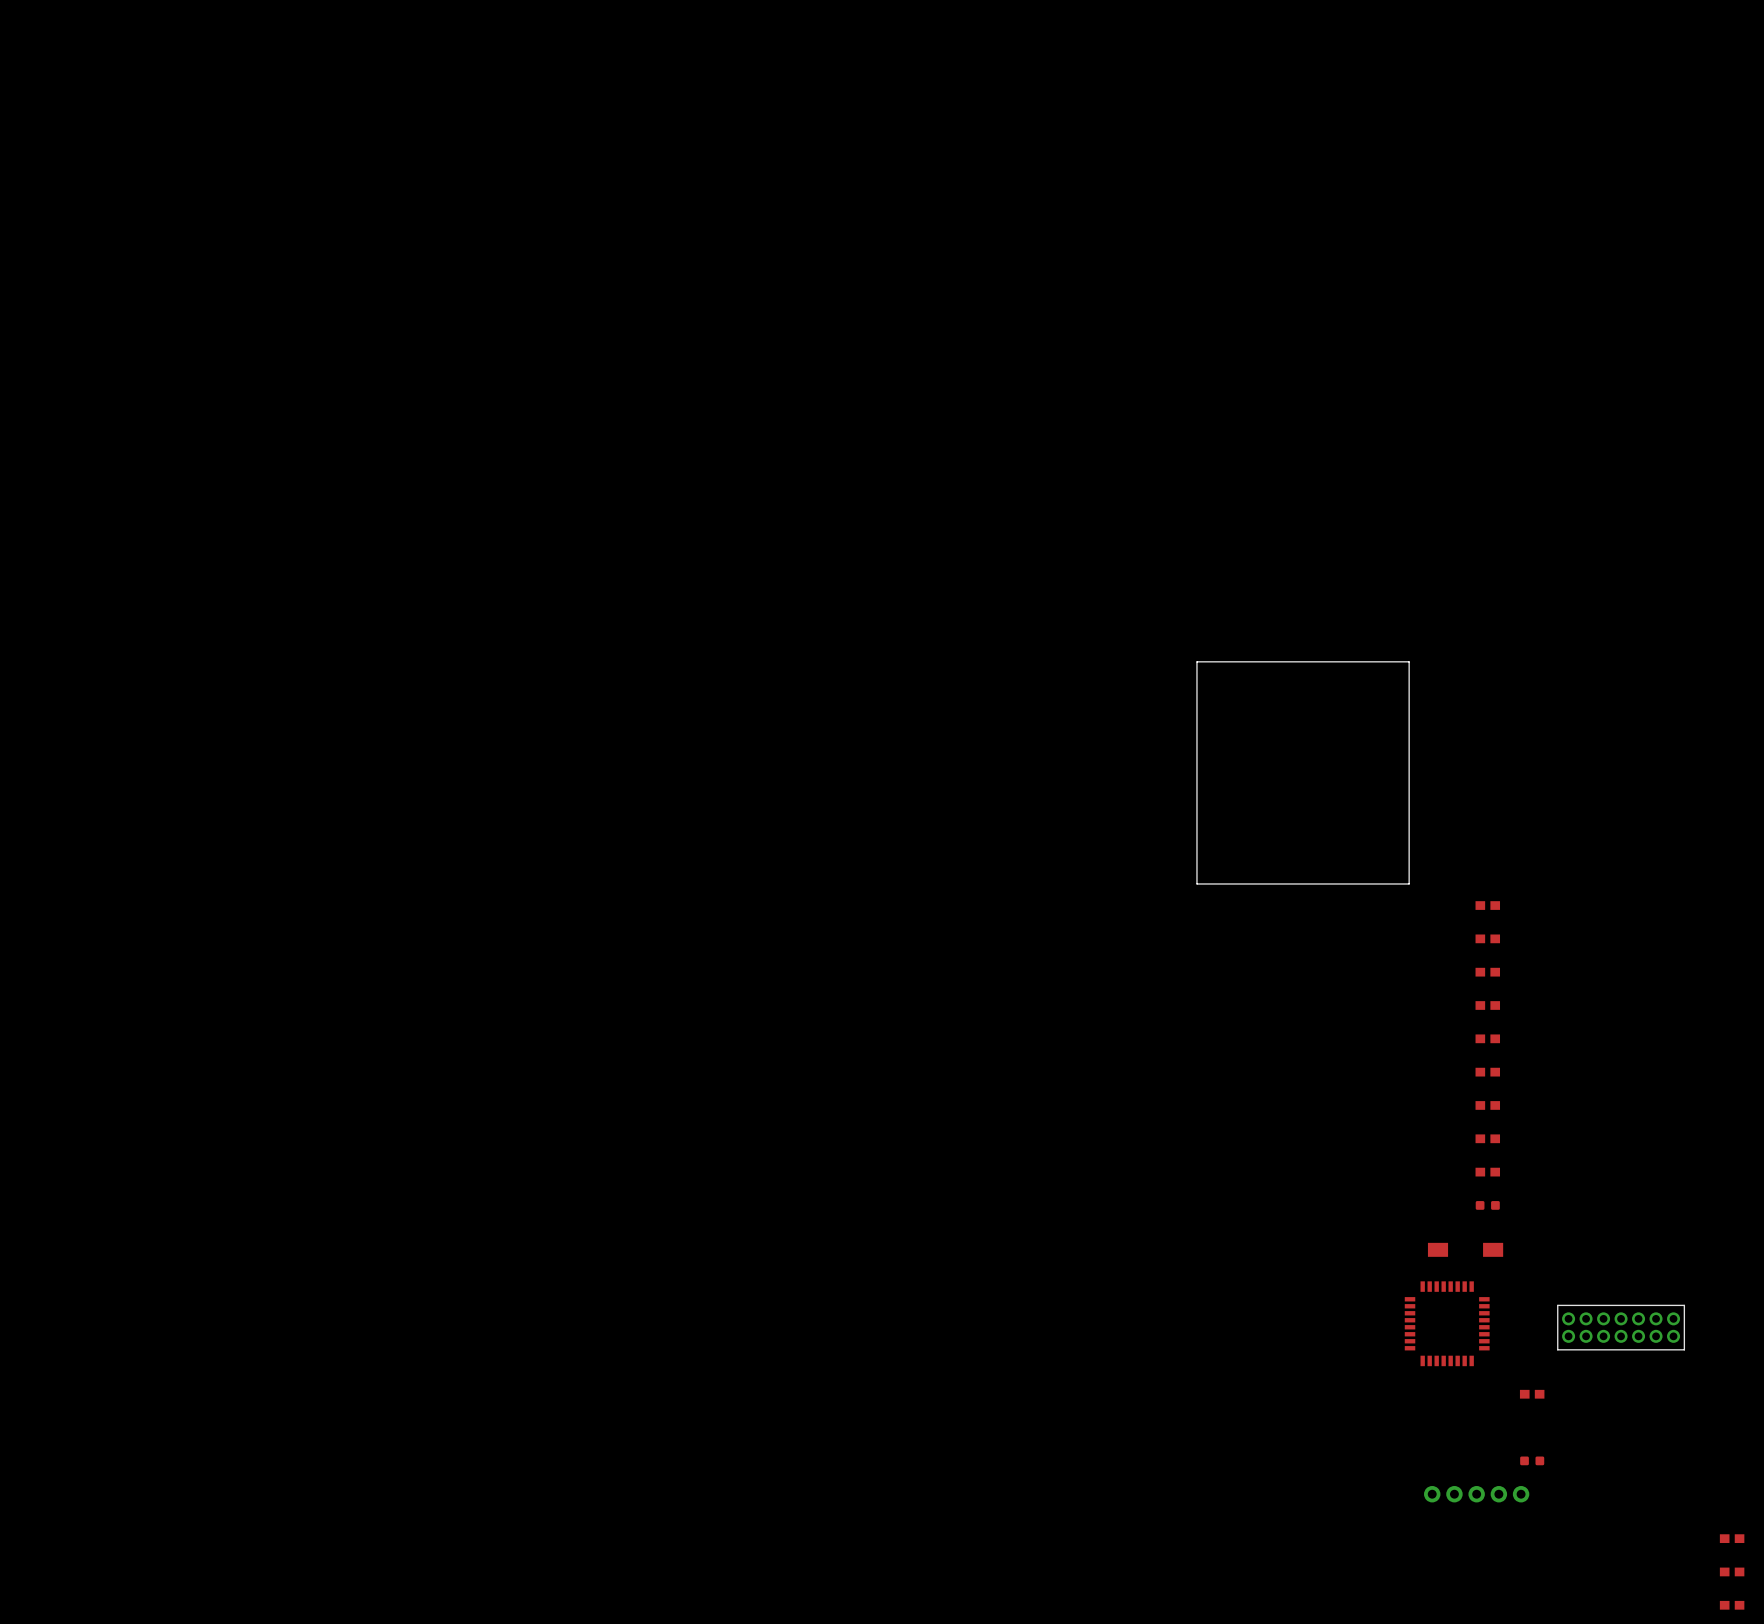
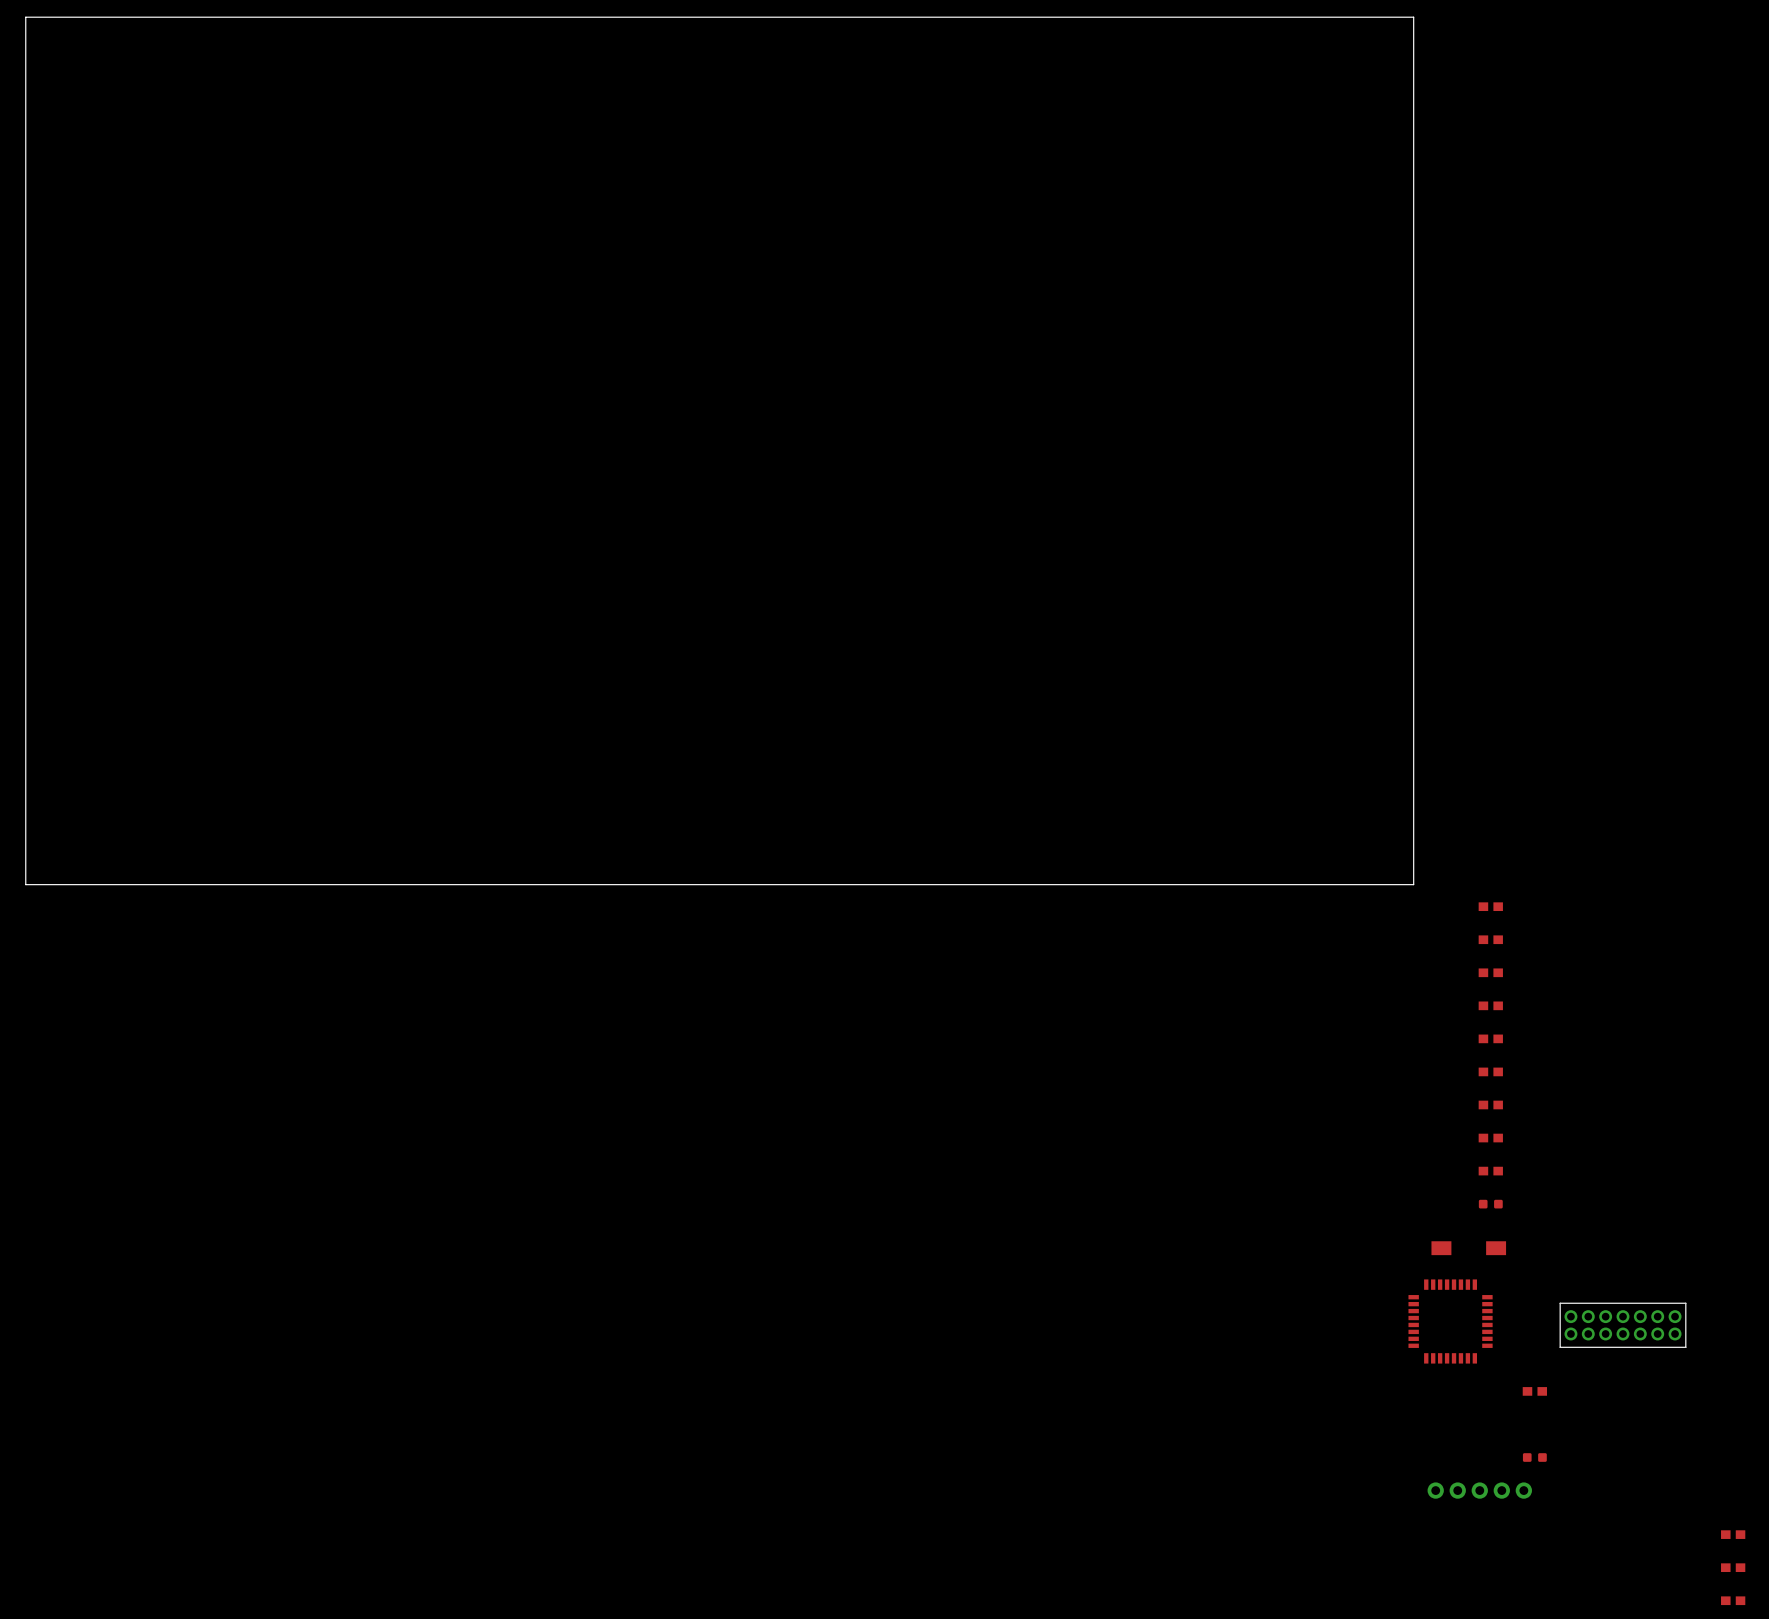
board edge: none -> (1413, 17) (25, 17) (25, 884) (1413, 884) (1413, 17)
board edge: (1409, 661) (1196, 661) (1196, 883) (1409, 883) (1409, 661) -> none

